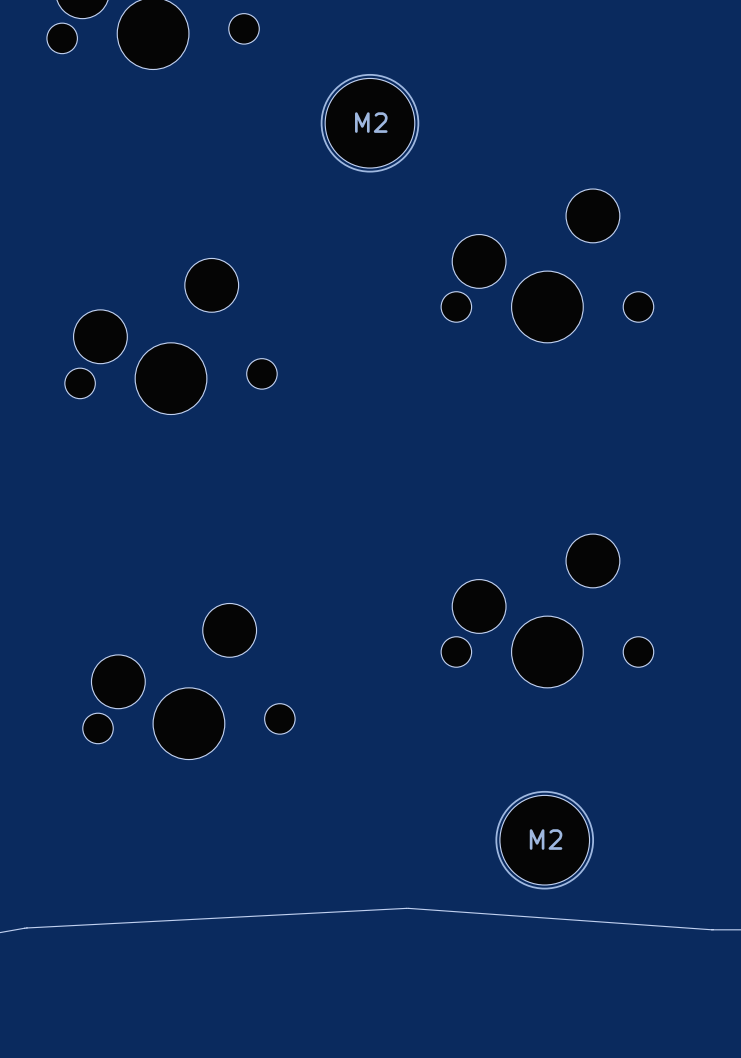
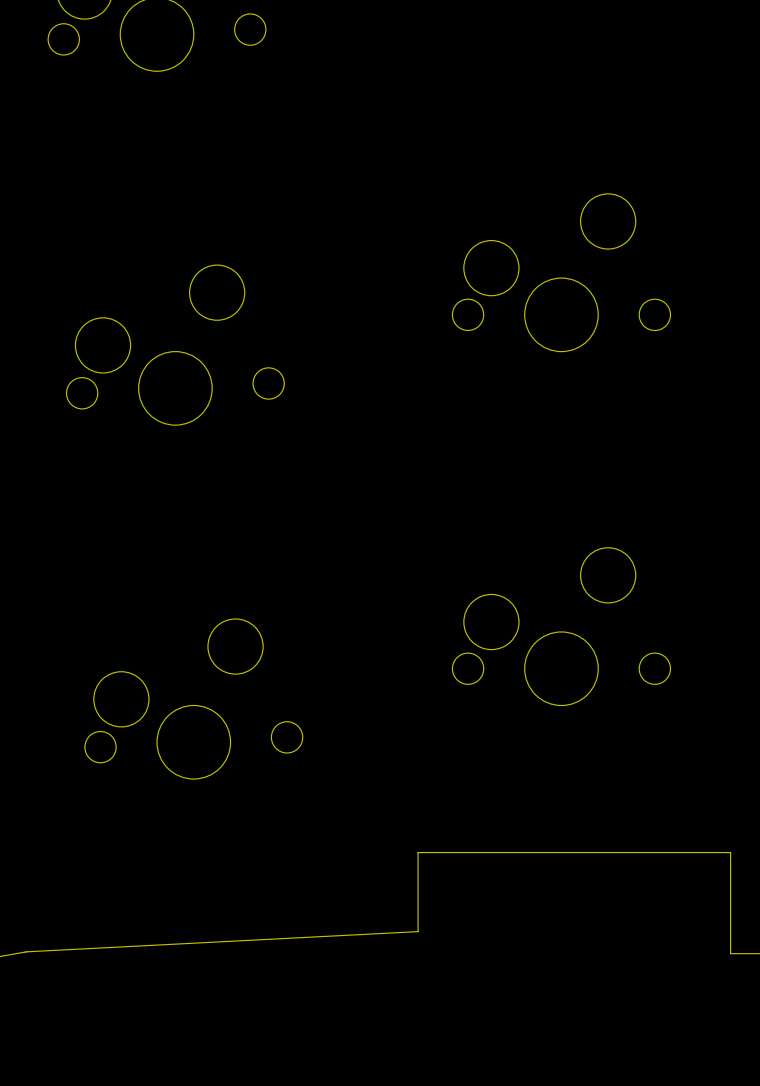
part: (369, 123) -> none
part: (544, 840) -> none
board edge: (406, 908) (712, 929) -> (416, 931) (418, 852) (730, 852) (731, 953)

